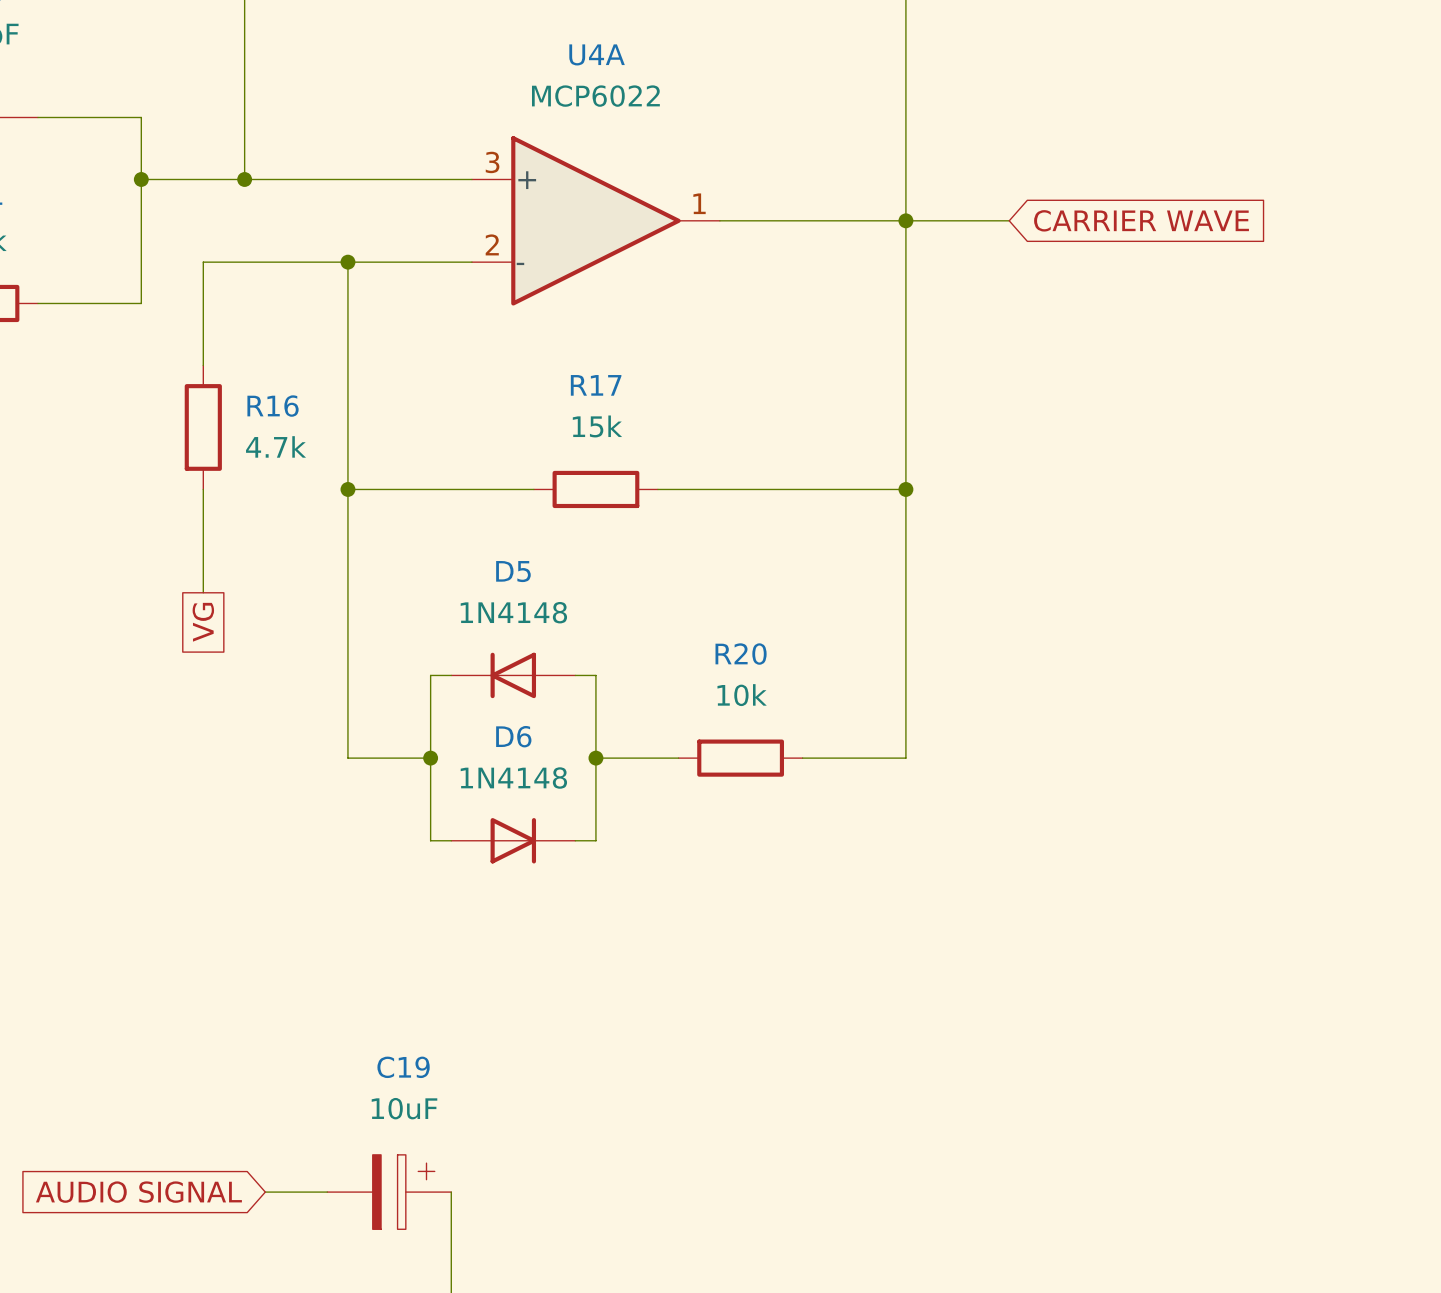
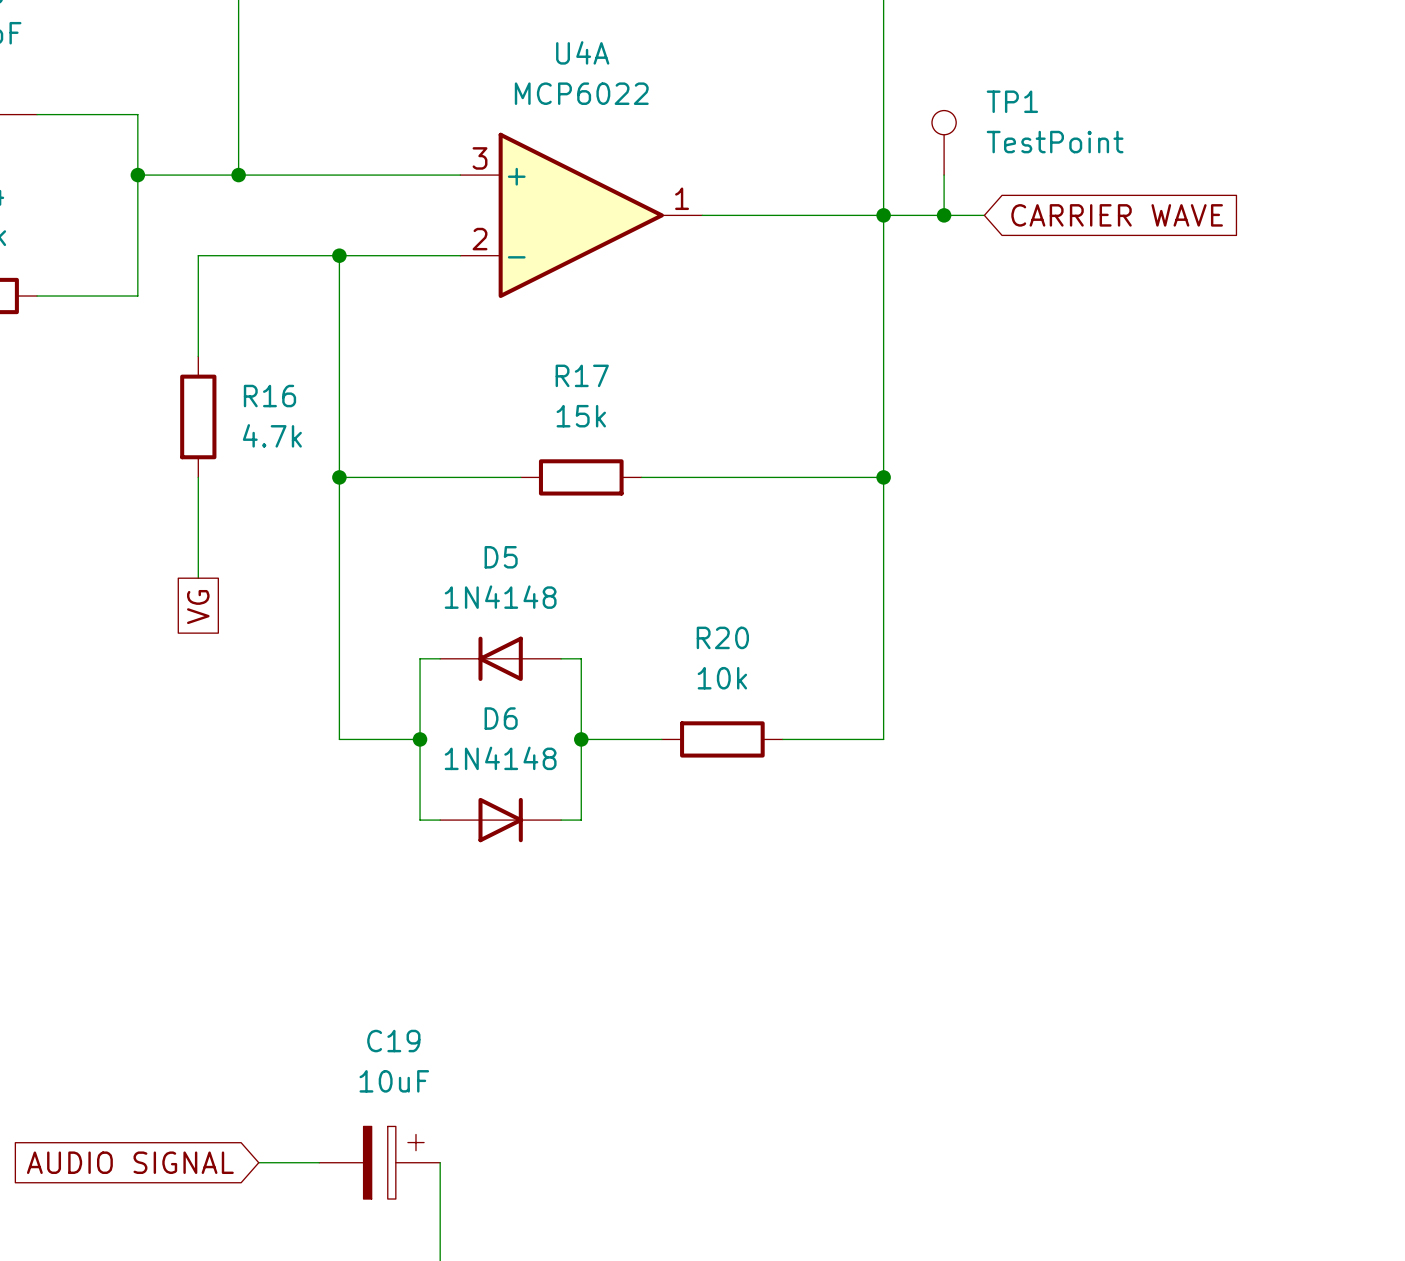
TP1: none -> TestPoint (944, 142)
wire: none -> (944, 175) (944, 215)
junction: none -> (944, 215)

